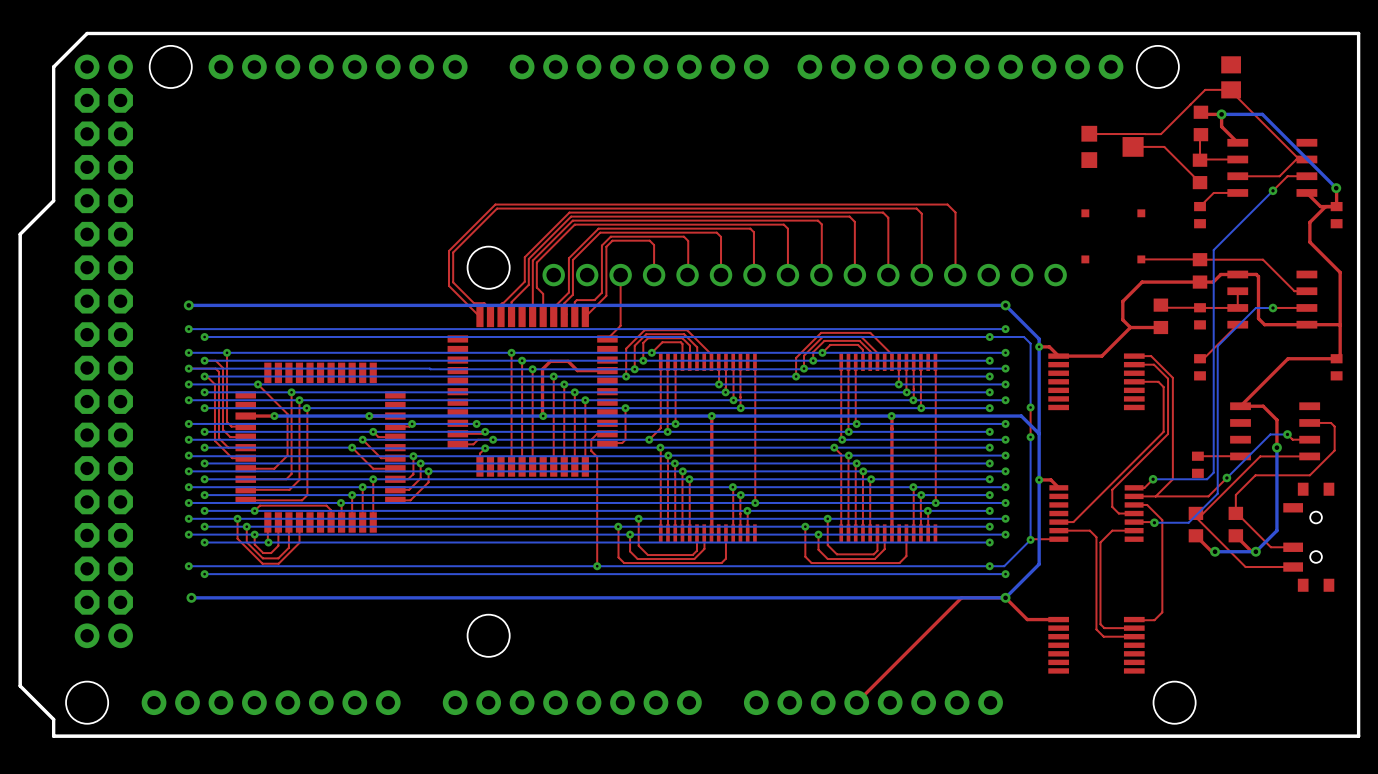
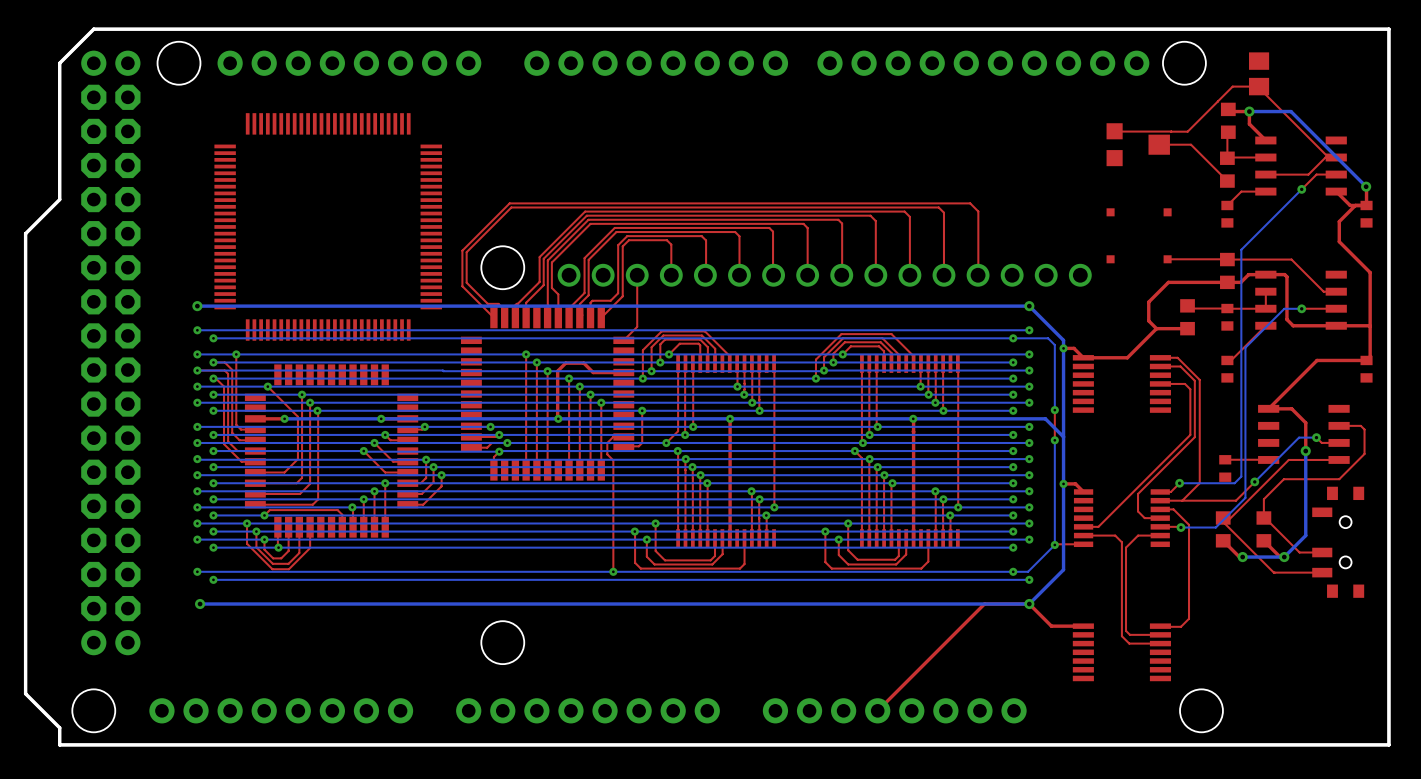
part: none -> (328, 226)

